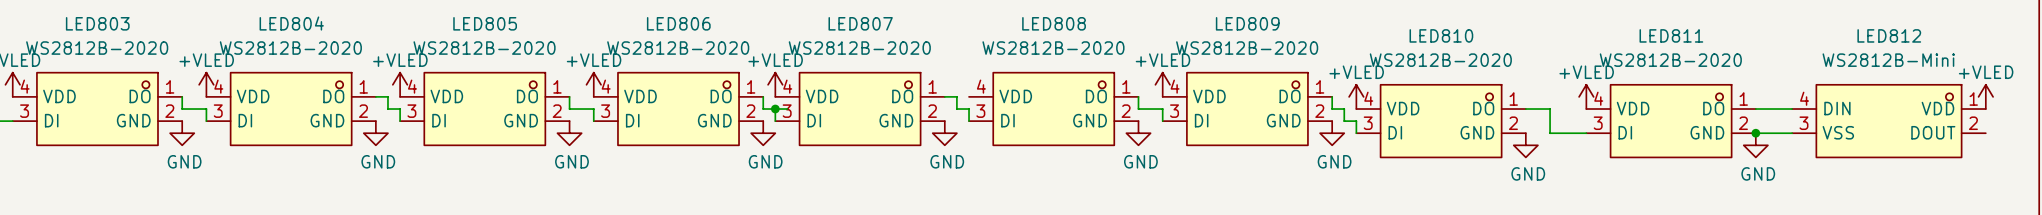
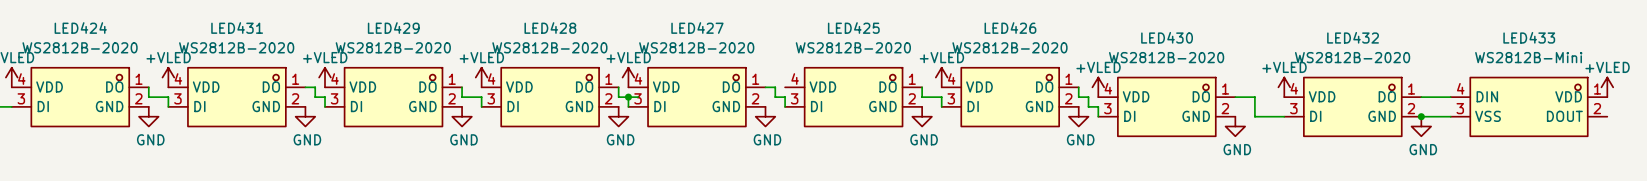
LED803 name: LED803 (97, 23) -> LED424 (80, 28)
LED804 name: LED804 (291, 23) -> LED431 (237, 28)
LED805 name: LED805 (485, 23) -> LED429 (393, 28)
LED806 name: LED806 (678, 23) -> LED428 (550, 28)
LED807 name: LED807 (860, 23) -> LED427 (697, 28)
LED808 name: LED808 (1054, 23) -> LED425 (853, 28)
LED809 name: LED809 (1247, 23) -> LED426 (1010, 28)
LED810 name: LED810 (1441, 35) -> LED430 (1167, 37)
LED811 name: LED811 (1671, 35) -> LED432 (1353, 37)
LED812 name: LED812 (1889, 35) -> LED433 (1529, 37)

